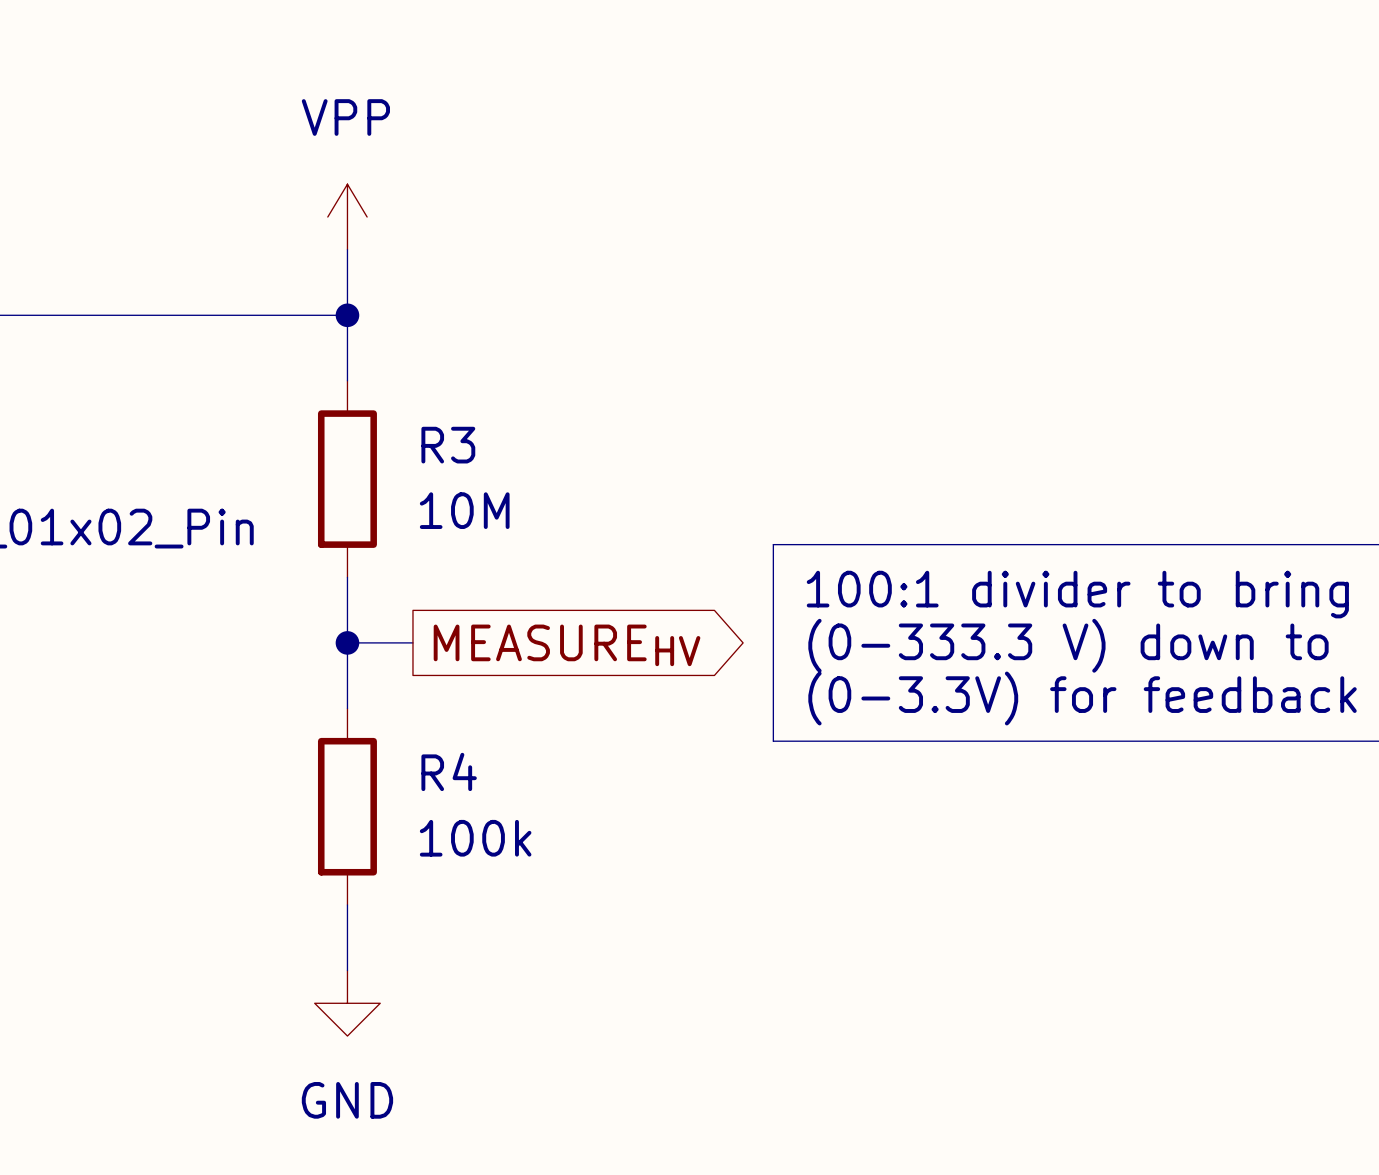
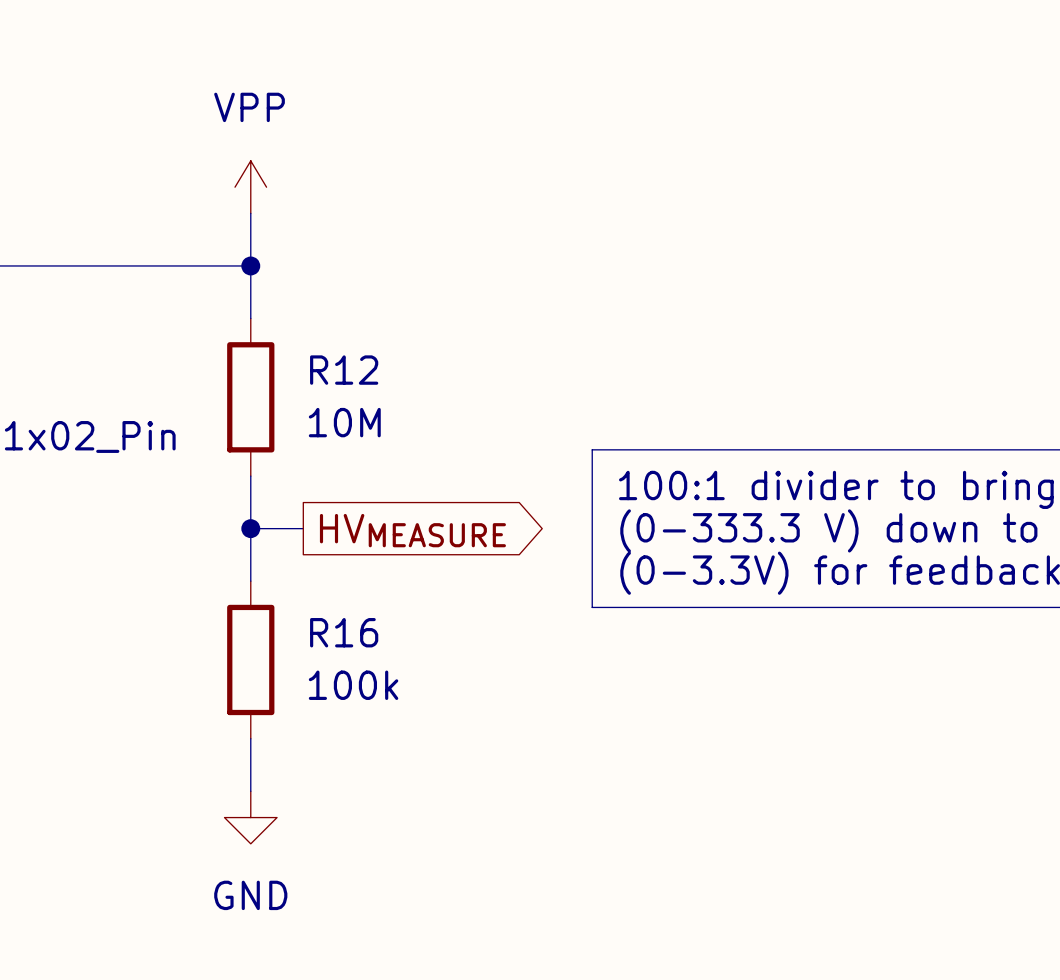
R3 name: R3 (448, 445) -> R12 (344, 370)
global label: MEASUREHV (567, 645) -> HVMEASURE (412, 530)
R4 name: R4 (449, 771) -> R16 (344, 632)

